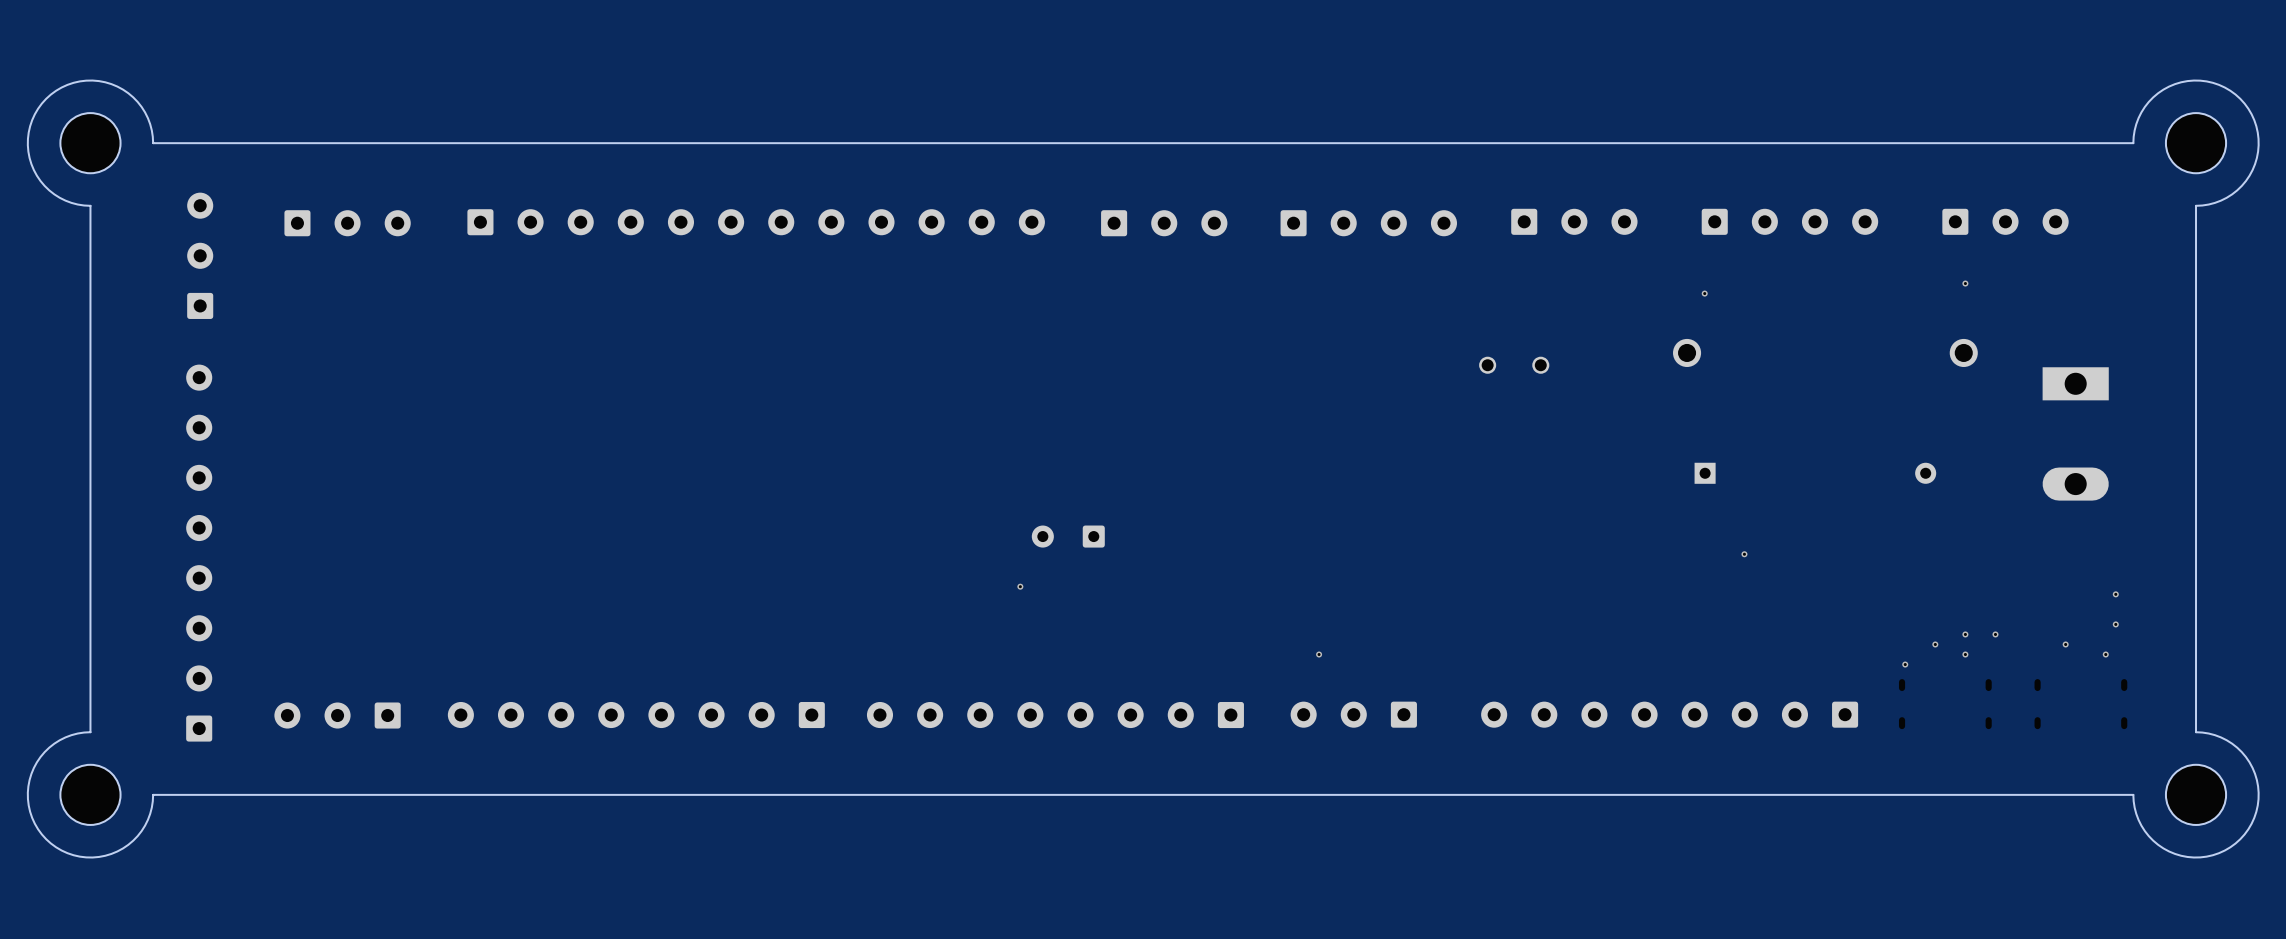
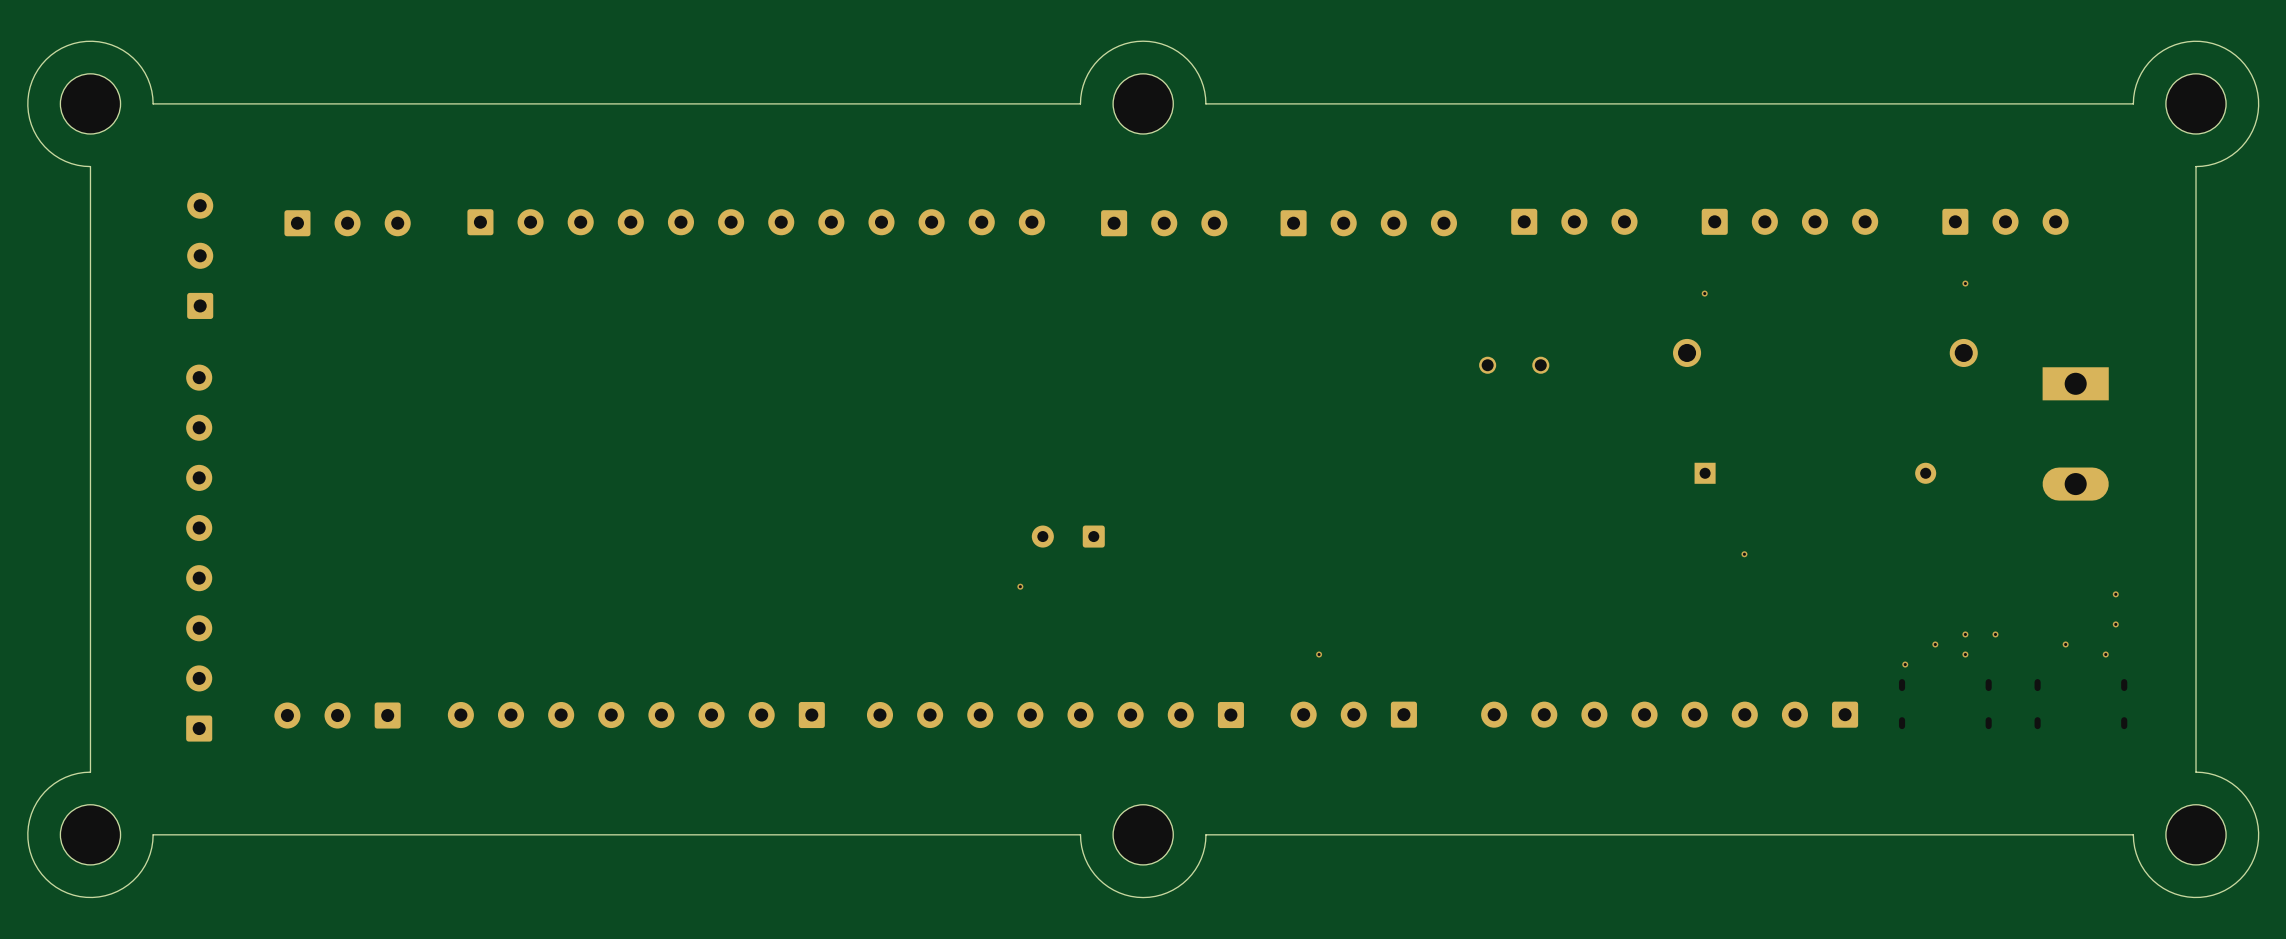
part: none -> (1143, 103)
part position: (90, 143) -> (90, 103)
part position: (2196, 143) -> (2196, 103)
board edge: (90, 205) (71, 202) (49, 190) (33, 170) (27, 145) (32, 120) (46, 98) (67, 84) (92, 80) (111, 84) (133, 97) (147, 118) (153, 143) (2133, 143) (2138, 118) (2153, 97) (2175, 84) (2200, 80) (2224, 87) (2244, 103) (2254, 120) (2258, 145) (2252, 170) (2237, 190) (2214, 202) (2196, 205) -> (90, 205) (90, 166) (65, 161) (44, 146) (33, 130) (27, 106) (30, 87) (41, 64) (61, 48) (79, 42) (105, 43) (117, 47) (133, 58) (147, 78) (153, 103) (1080, 103) (1085, 79) (1098, 59) (1119, 45) (1143, 41) (1167, 45) (1187, 59) (1201, 79) (1205, 103) (2133, 103) (2138, 78) (2153, 58) (2169, 47) (2181, 43) (2206, 42) (2224, 48) (2244, 64) (2256, 87) (2258, 106) (2252, 130) (2241, 146) (2220, 161) (2196, 166) (2196, 205)
board edge: (2196, 732) (2220, 737) (2241, 752) (2252, 767) (2258, 792) (2254, 817) (2240, 839) (2218, 853) (2193, 857) (2169, 851) (2153, 840) (2138, 819) (2133, 794) (153, 794) (147, 819) (133, 840) (111, 853) (86, 857) (61, 850) (41, 834) (30, 811) (27, 792) (33, 767) (44, 752) (65, 737) (90, 732) -> (2196, 732) (2196, 772) (2220, 777) (2241, 792) (2252, 807) (2258, 832) (2256, 851) (2244, 874) (2224, 890) (2206, 896) (2181, 895) (2169, 891) (2153, 880) (2138, 859) (2133, 834) (1205, 834) (1201, 858) (1187, 879) (1167, 892) (1143, 897) (1119, 892) (1098, 879) (1085, 858) (1080, 834) (153, 834) (147, 859) (133, 880) (117, 891) (105, 895) (79, 896) (61, 890) (41, 874) (30, 851) (27, 832) (33, 807) (44, 792) (65, 777) (90, 772) (90, 732)
part position: (90, 794) -> (90, 834)
part position: (2196, 794) -> (2196, 834)
part: none -> (1143, 834)

